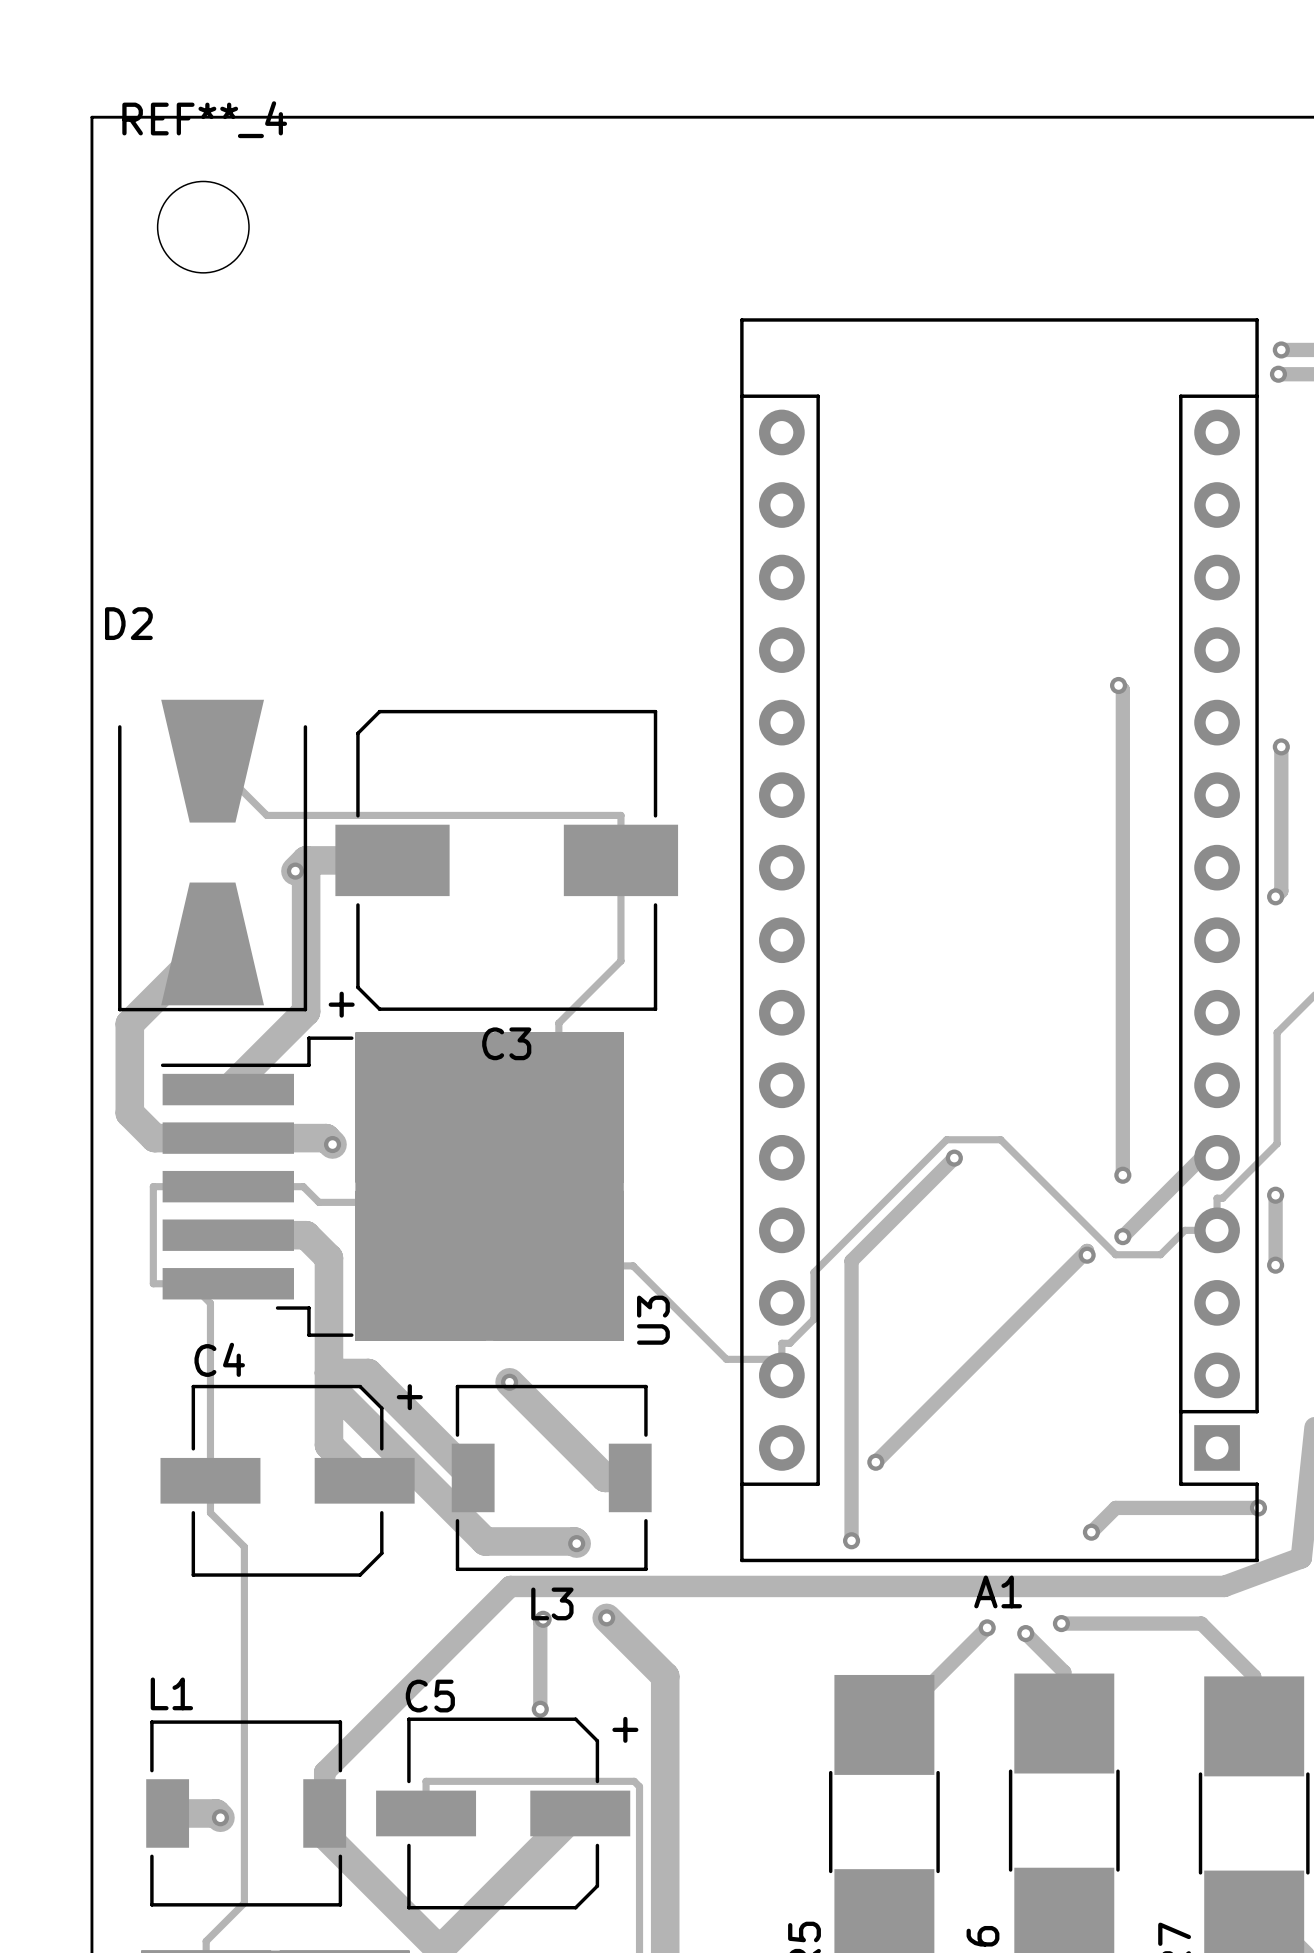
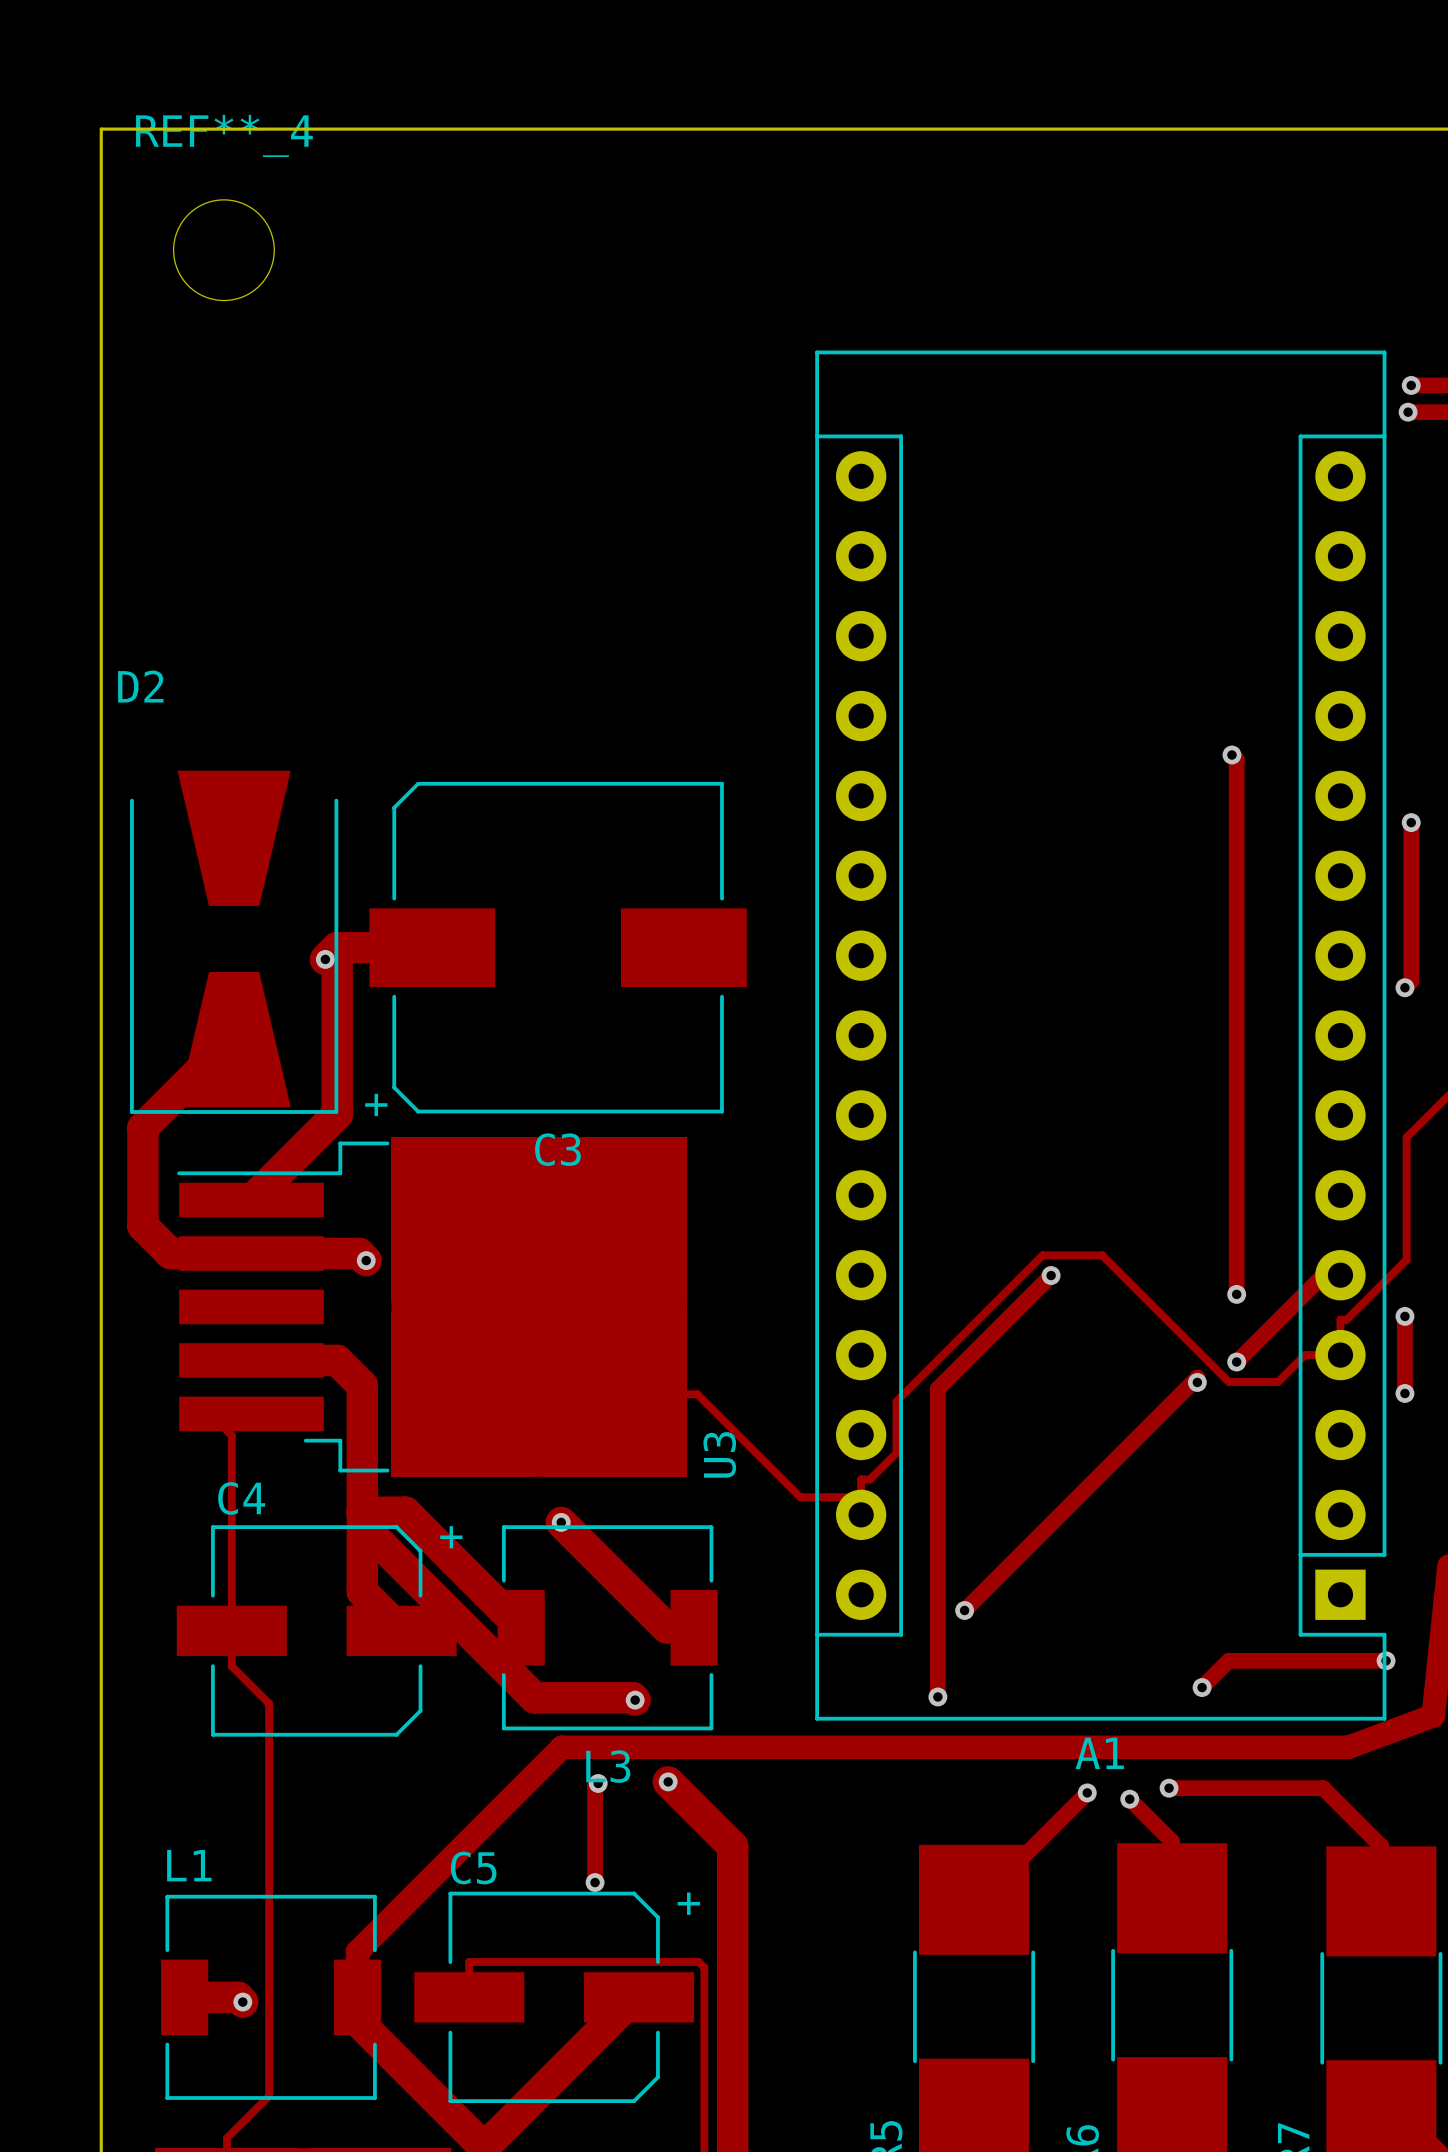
track: (212, 761) (266, 815) (620, 815) (620, 961) (558, 1023) (558, 1191) (553, 1191) (524, 1221) -> none
track: (420, 1202) (318, 1202) (303, 1186) (153, 1186) (153, 1283) (228, 1283) -> none

